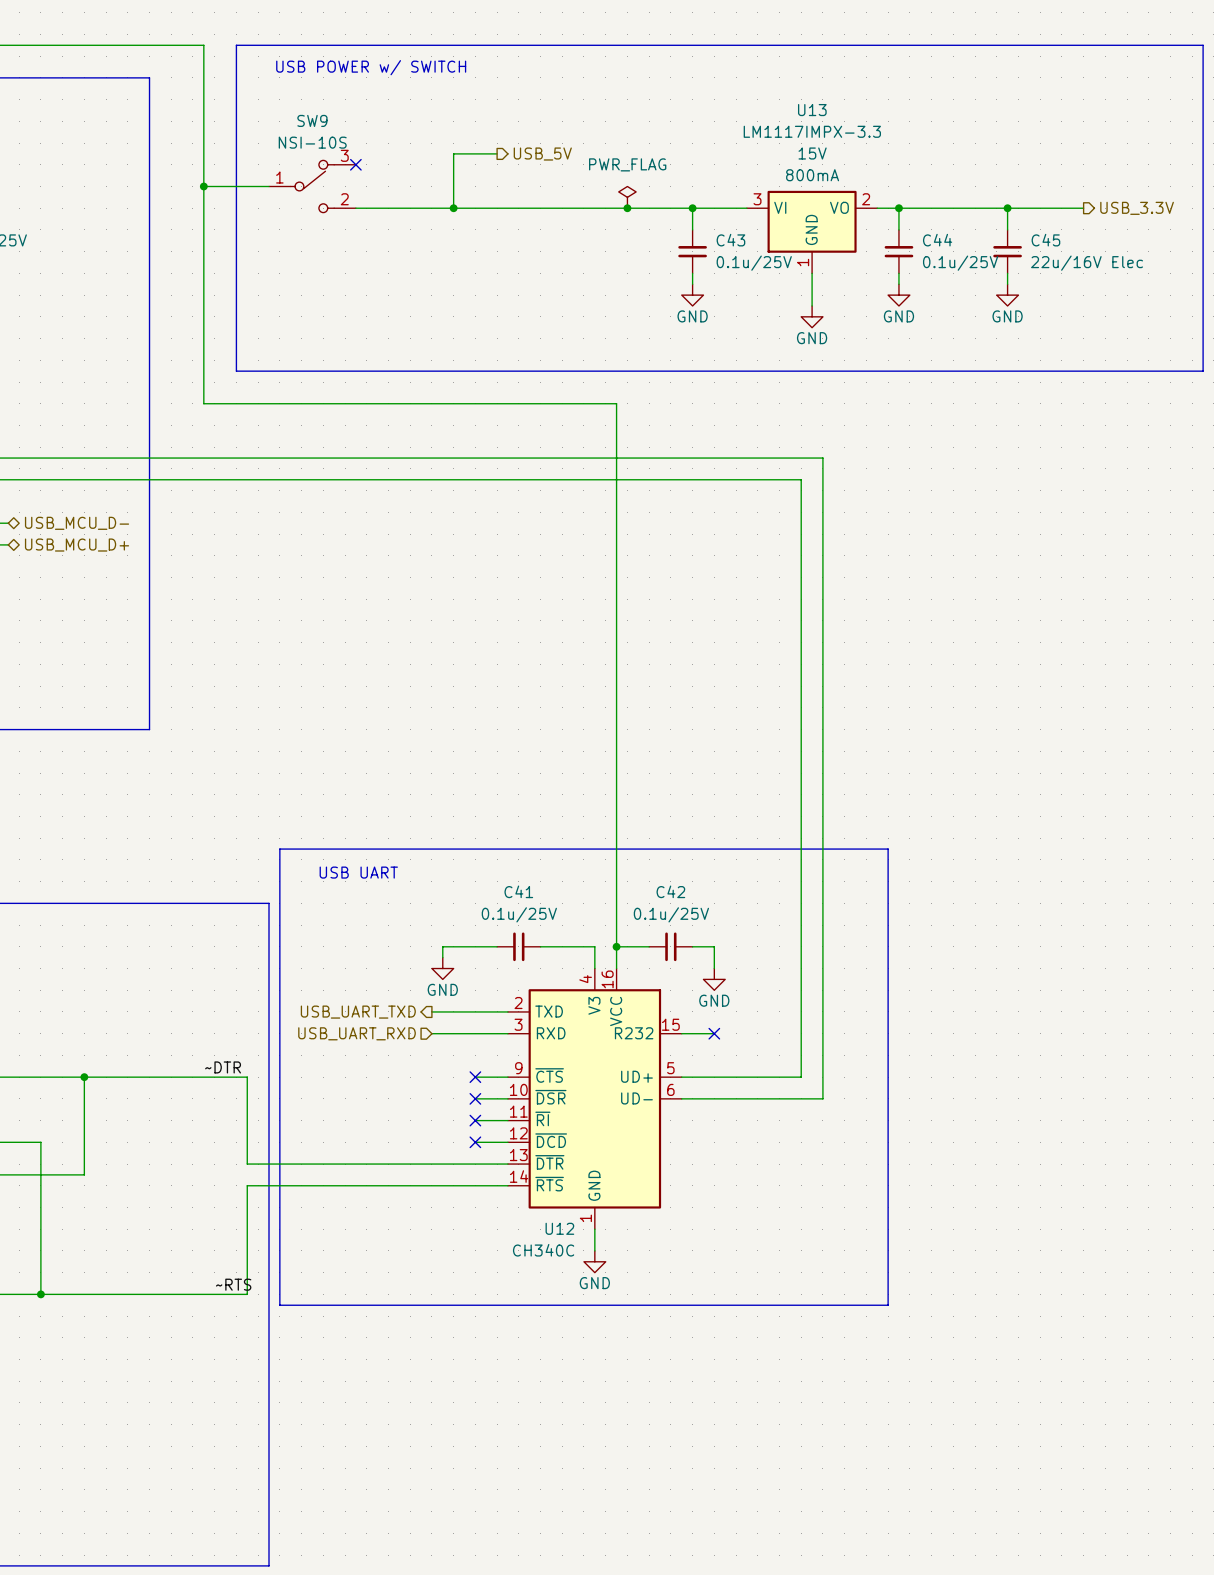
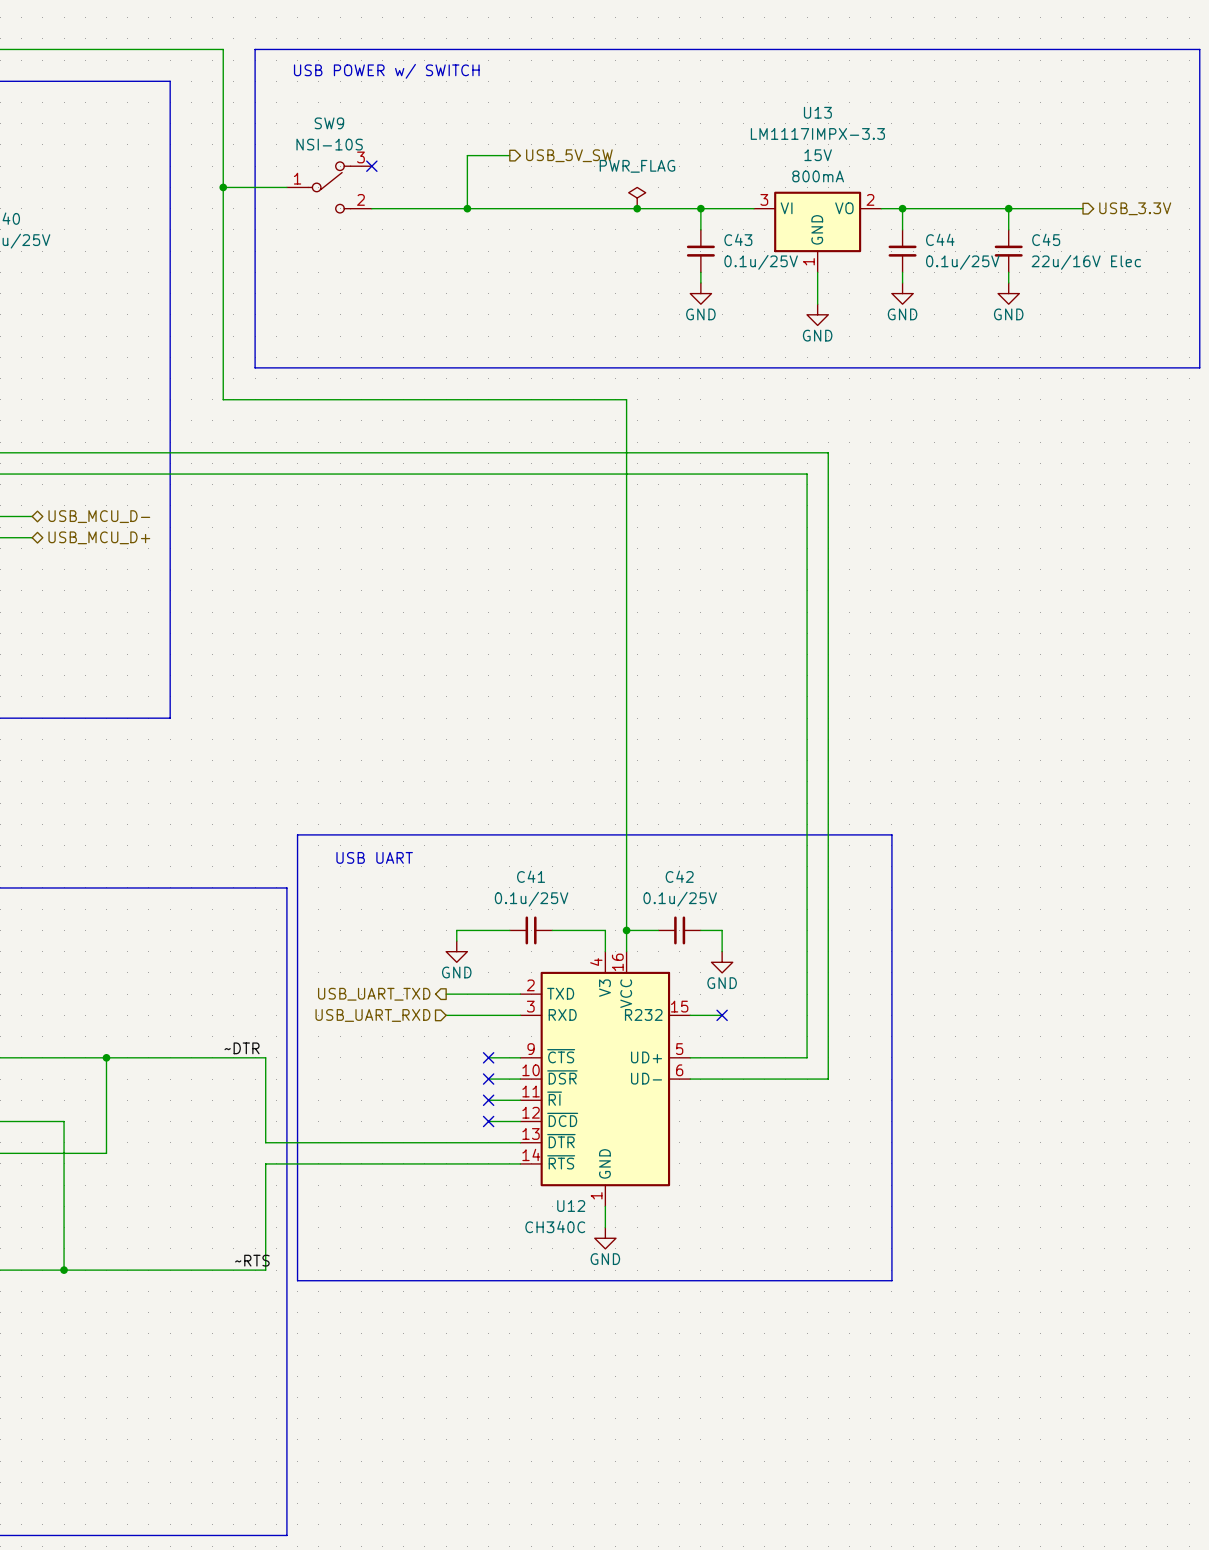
hierarchical label: USB_5V (542, 154) -> USB_5V_SW (569, 155)

